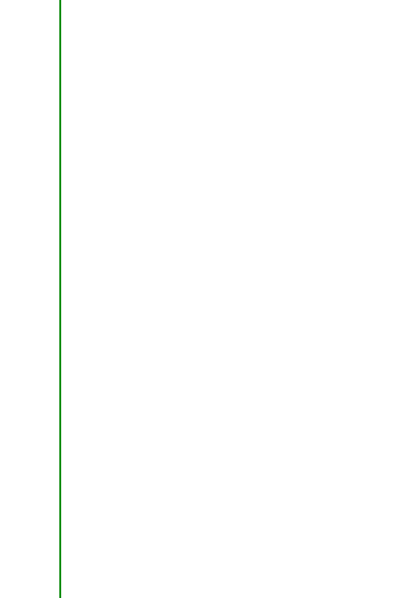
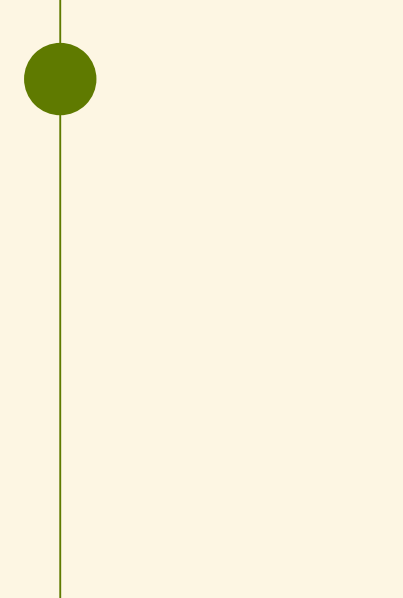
junction: none -> (60, 79)

